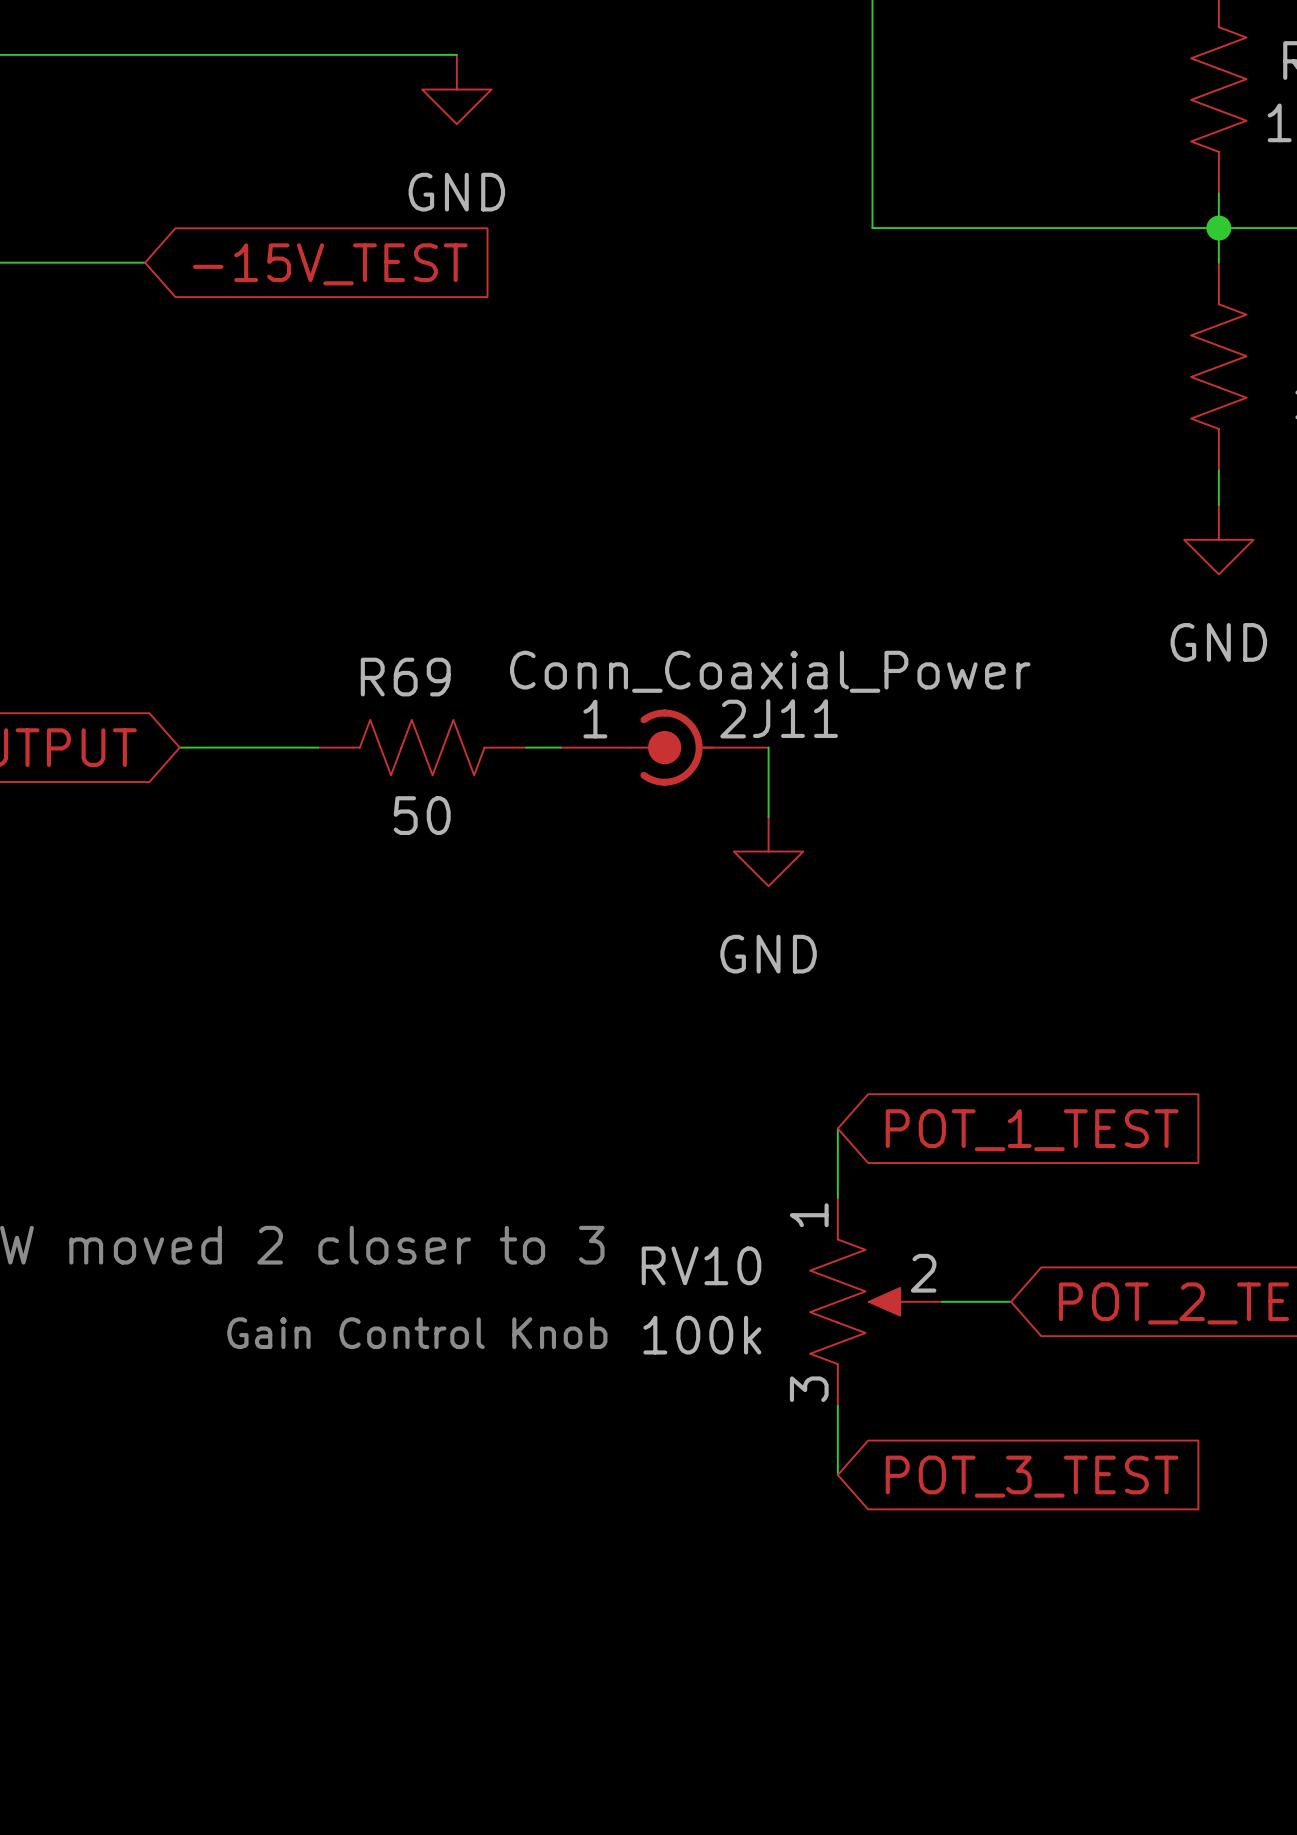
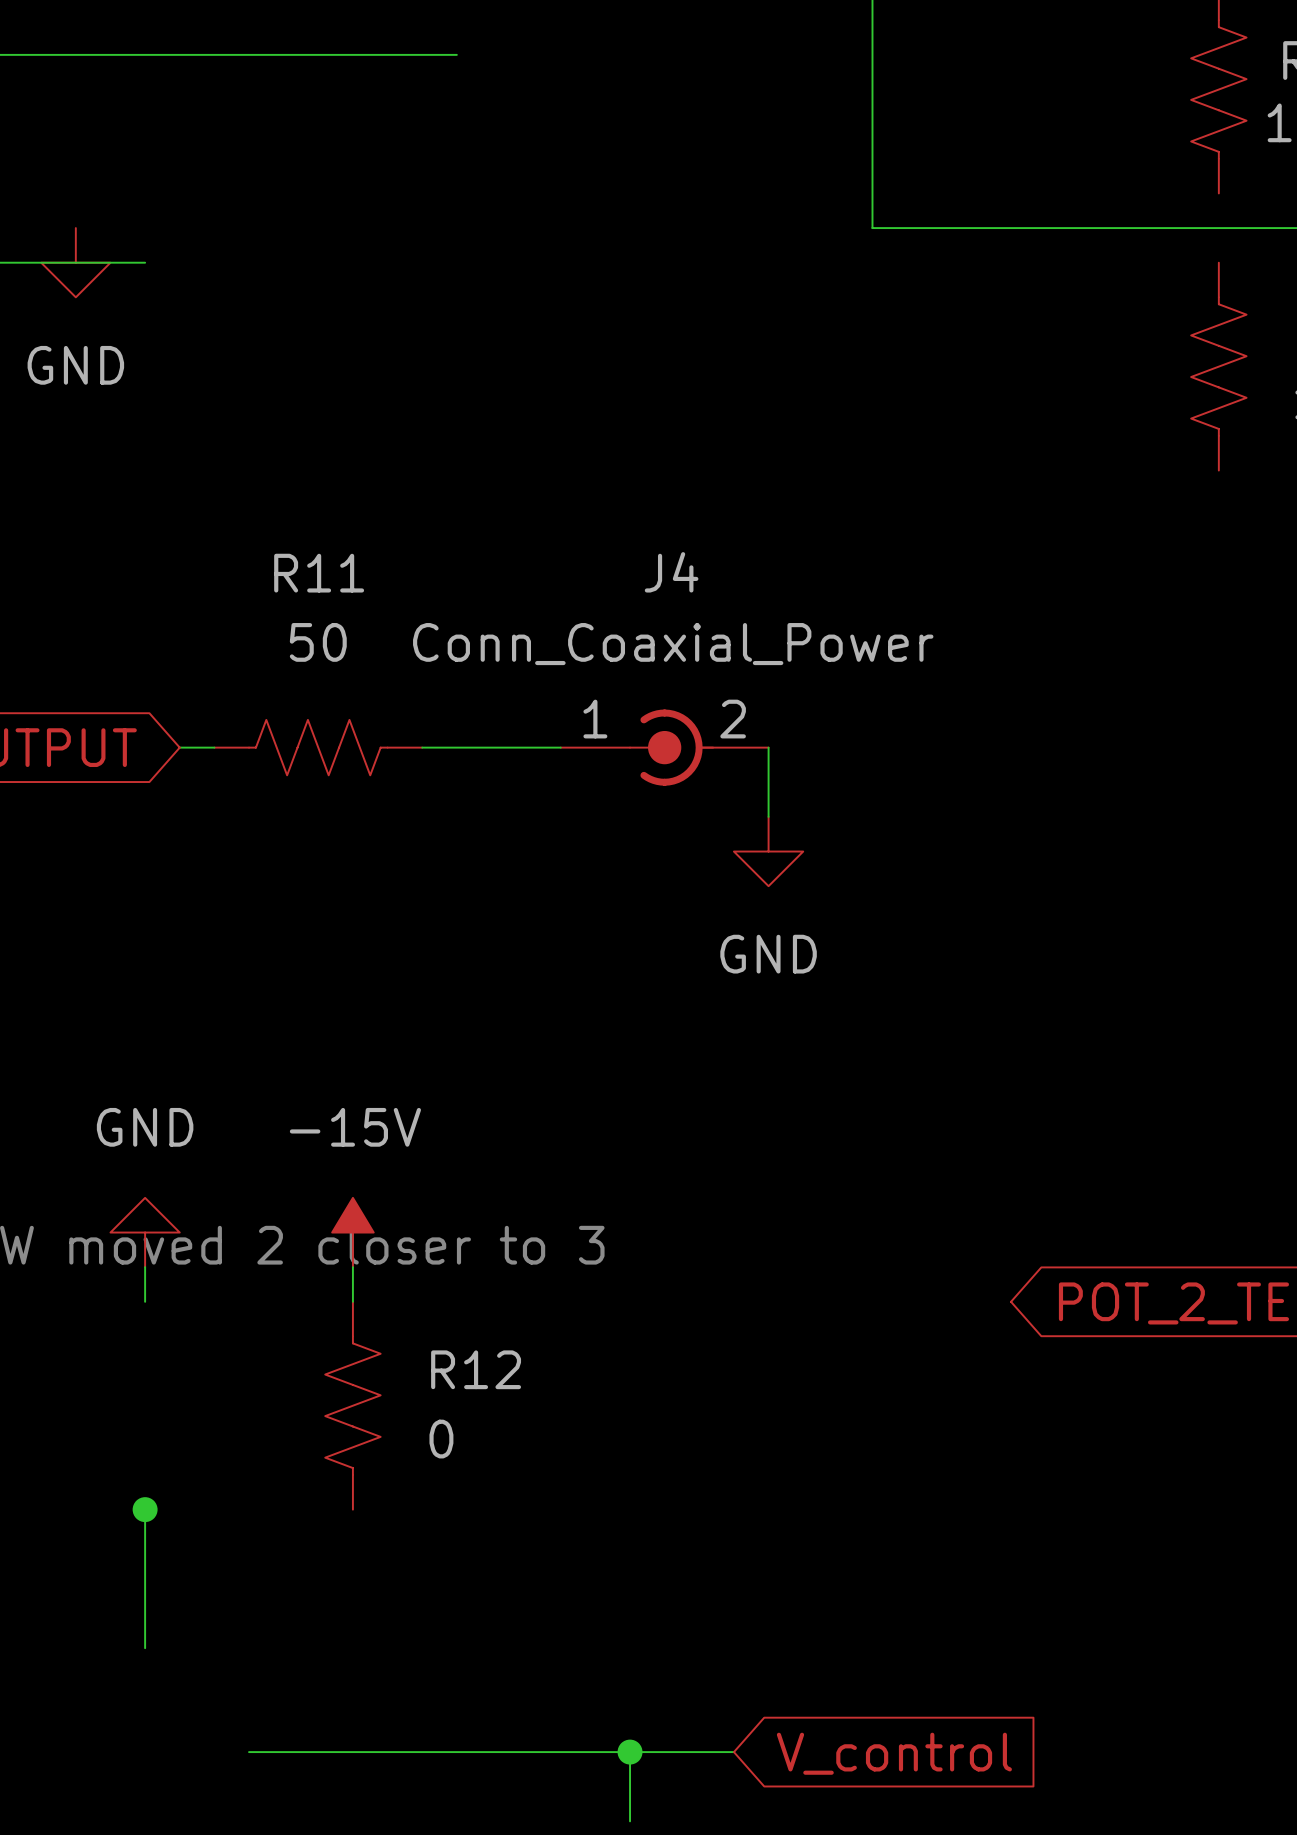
power symbol position: GND (456, 89) -> GND (75, 262)
wire: (1218, 193) (1218, 262) -> none
junction: (1218, 228) -> none
global label: -15V_TEST (330, 264) -> none
wire: (1218, 470) (1218, 505) -> none
power symbol: GND (1218, 539) -> none
J11 value position: Conn_Coaxial_Power (770, 671) -> Conn_Coaxial_Power (673, 644)
J11 name: J11 (795, 718) -> J4 (671, 572)
wire: (214, 747) (318, 747) -> (422, 747) (526, 747)
R11: none -> 50 (318, 747)
R69: 50 (422, 747) -> none
wire: (837, 1128) (837, 1197) -> none
global label: POT_1_TEST (1032, 1130) -> none
power symbol: none -> GND (145, 1232)
power symbol: none -> -15V (352, 1232)
wire: none -> (145, 1267) (145, 1301)
wire: none -> (352, 1267) (352, 1301)
RV10: 100k (875, 1301) -> none
wire: (941, 1301) (1011, 1301) -> none
text: Gain Control Knob (417, 1333) -> none
R12: none -> 0 (352, 1405)
wire: (837, 1405) (837, 1474) -> (630, 1752) (630, 1821)
global label: POT_3_TEST (1032, 1476) -> none
wire: none -> (145, 1509) (145, 1648)
junction: none -> (145, 1509)
wire: none -> (249, 1752) (733, 1752)
junction: none -> (630, 1752)
global label: none -> V_control (894, 1753)

